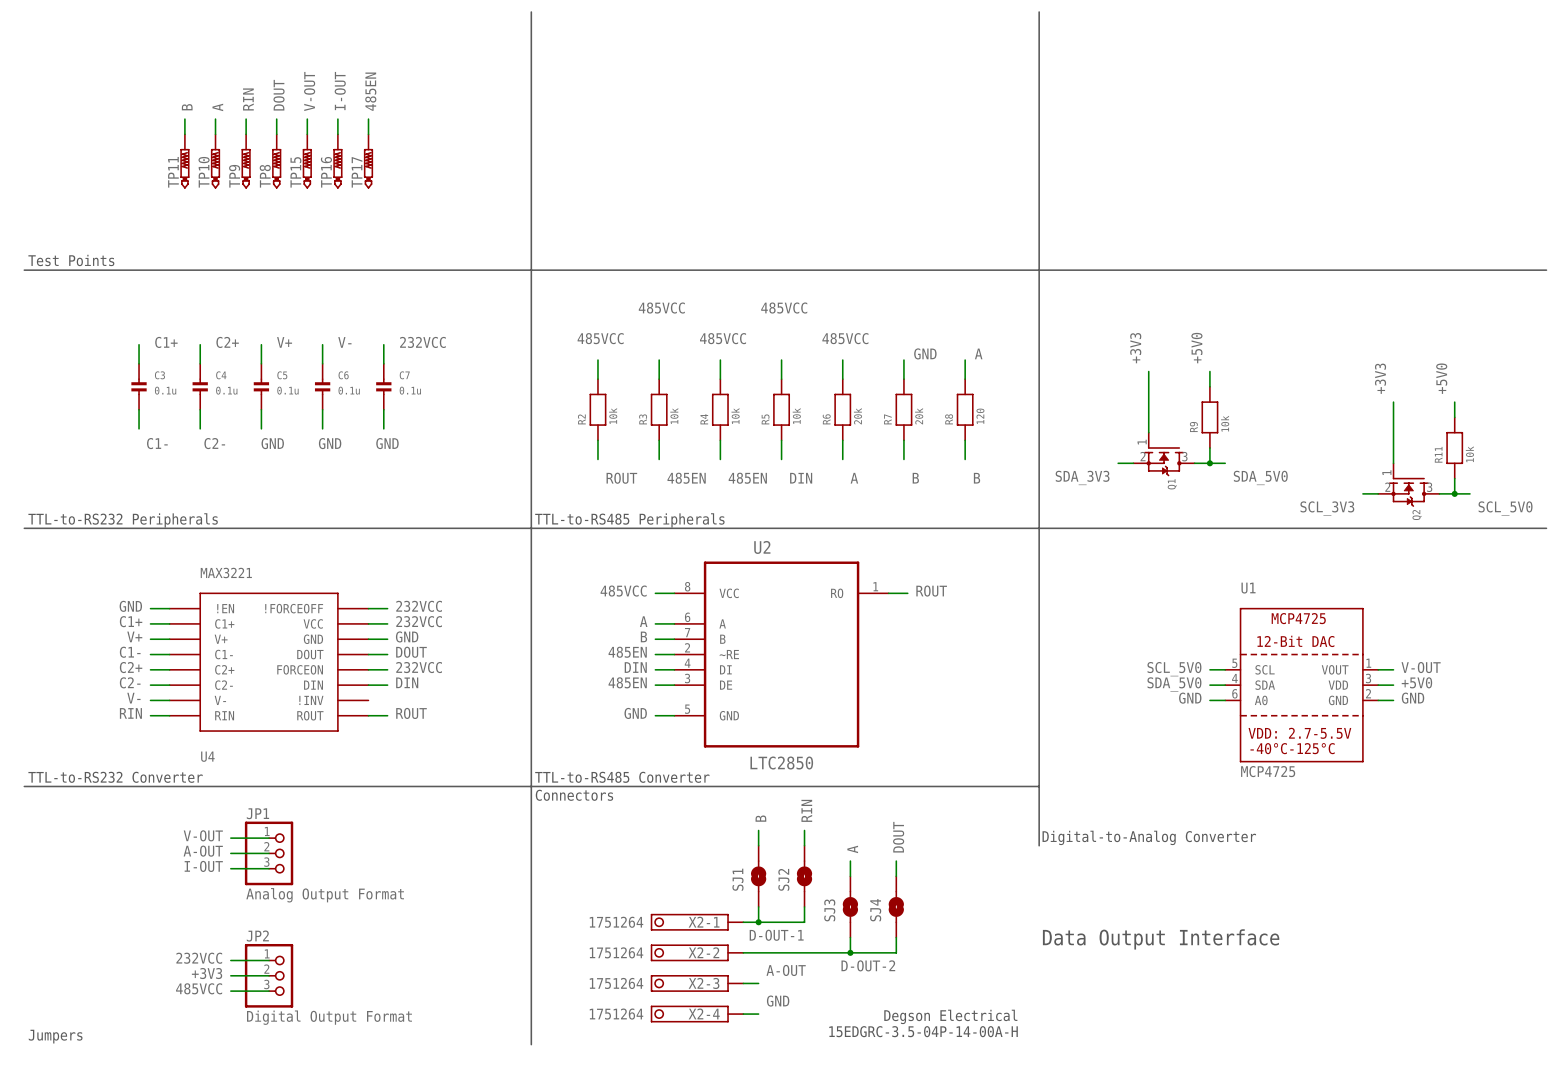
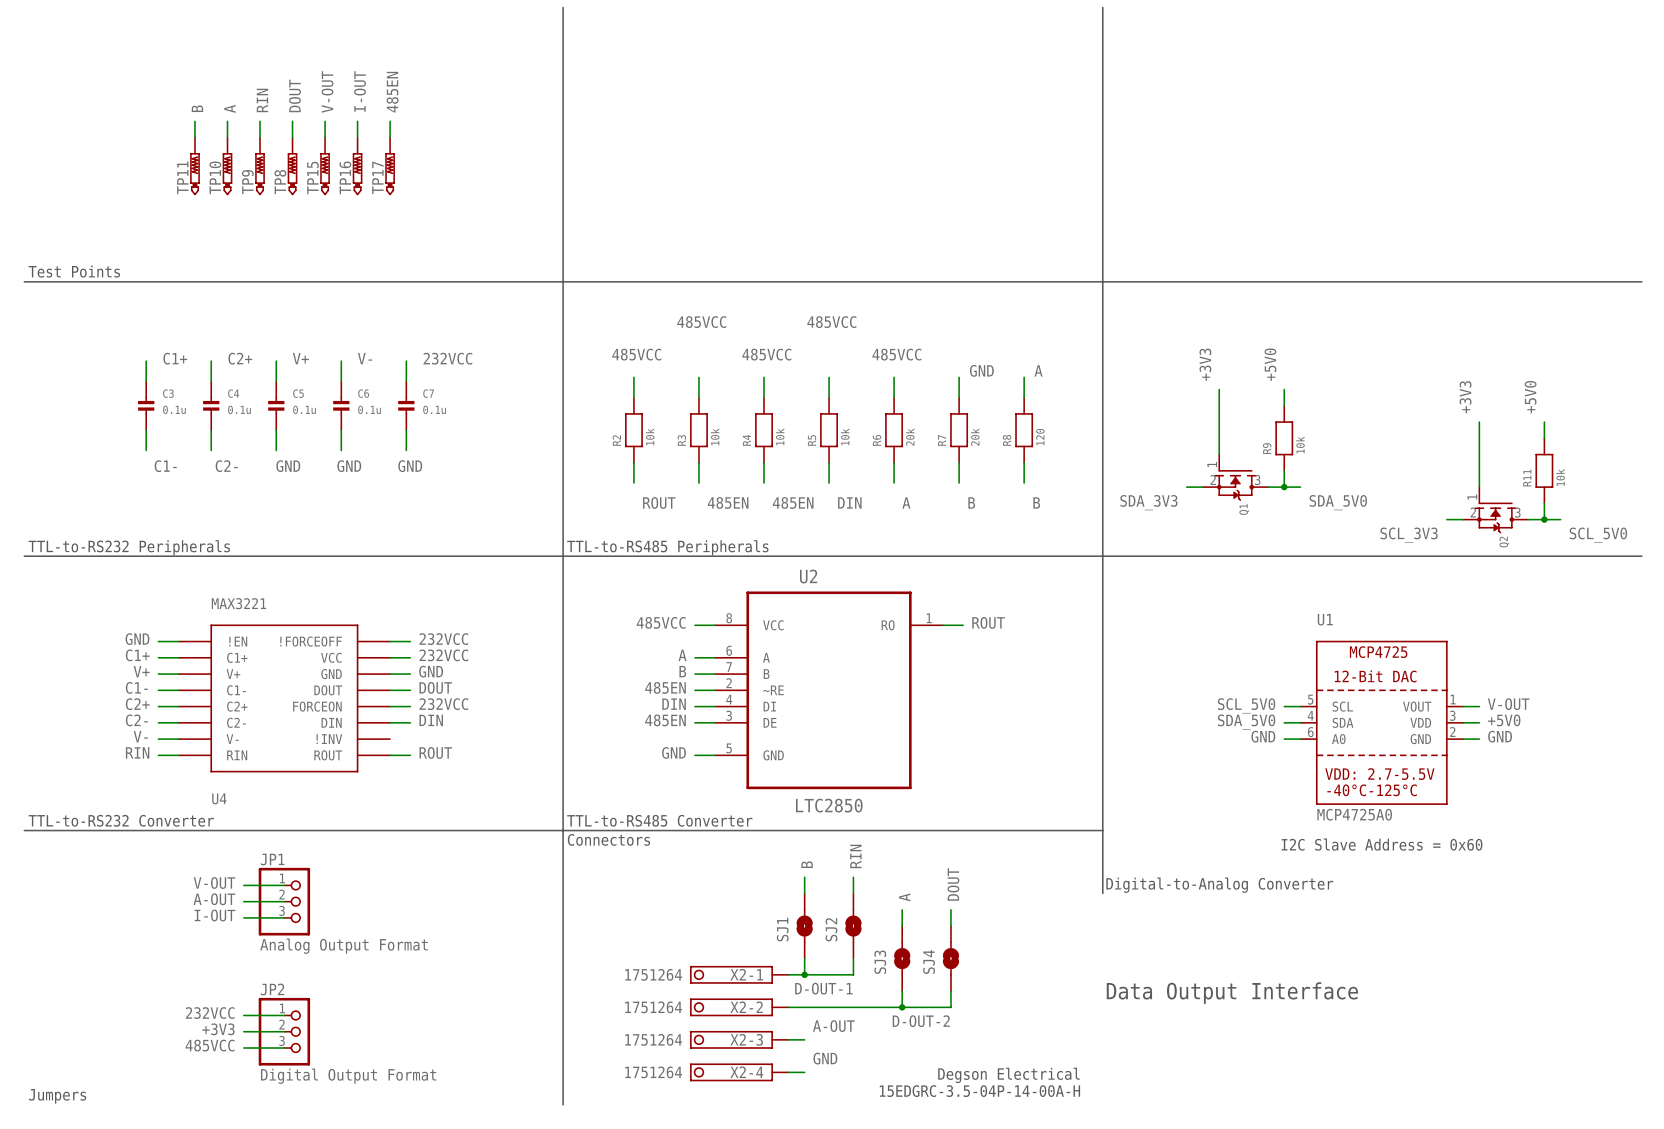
U1 value: MCP4725 (1268, 771) -> MCP4725A0 (1354, 814)
text: none -> I2C Slave Address = 0x60 (1382, 844)

